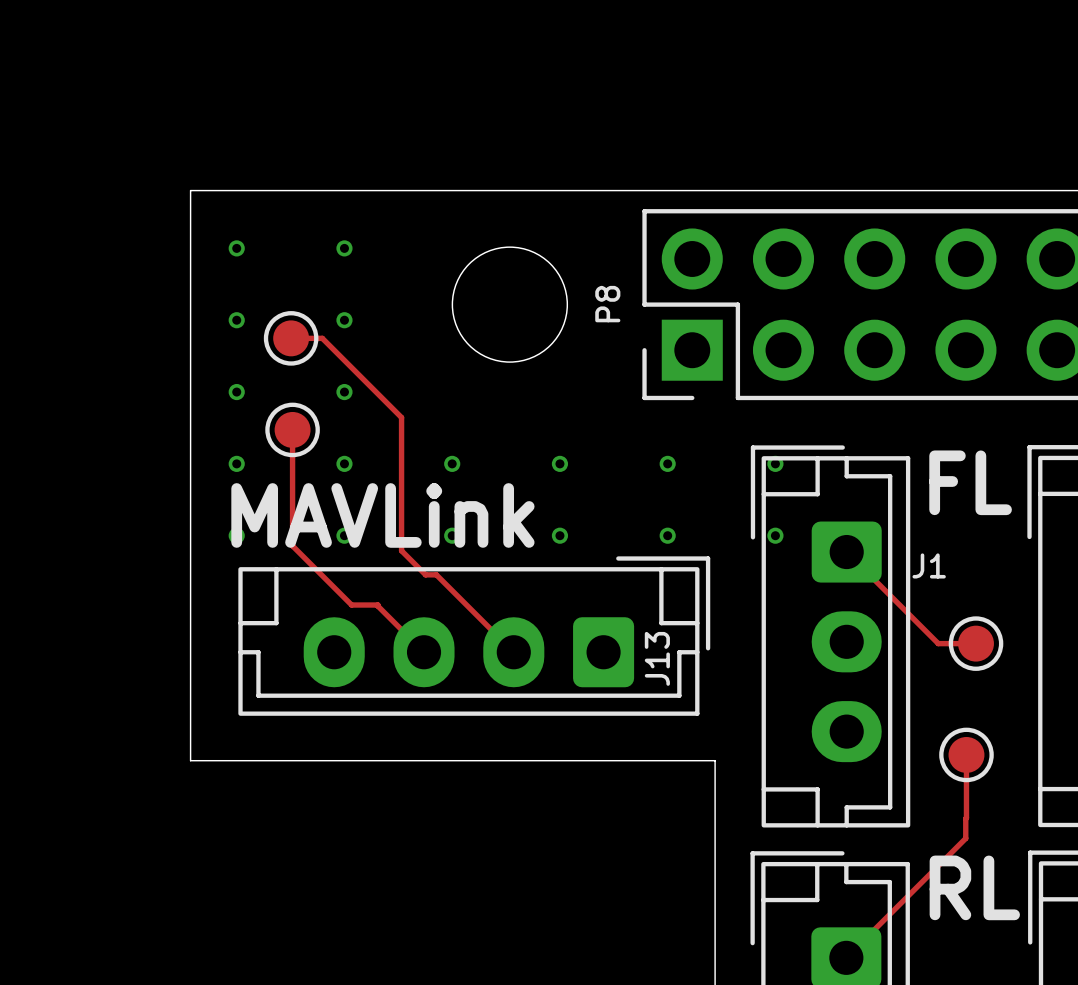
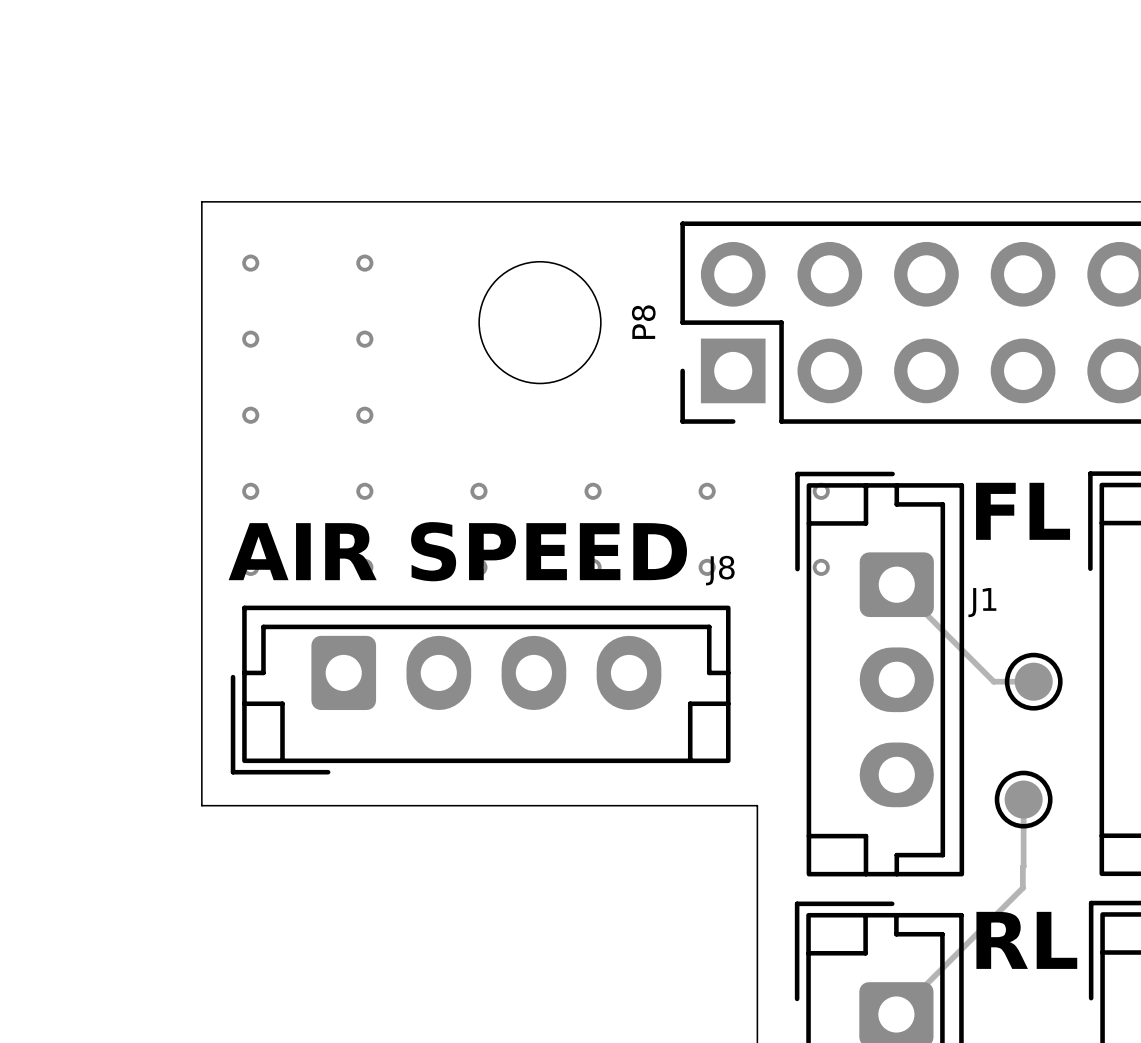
track: (291, 338) (322, 338) (401, 417) (401, 550) (425, 574) (436, 574) (513, 652) -> none
part: (291, 338) -> none
track: (292, 429) (292, 545) (351, 605) (377, 605) (424, 652) -> none
part: (292, 429) -> none
text: MAVLink (382, 515) -> AIR SPEED (457, 551)
J13: (474, 636) -> none
J8: none -> (480, 690)

